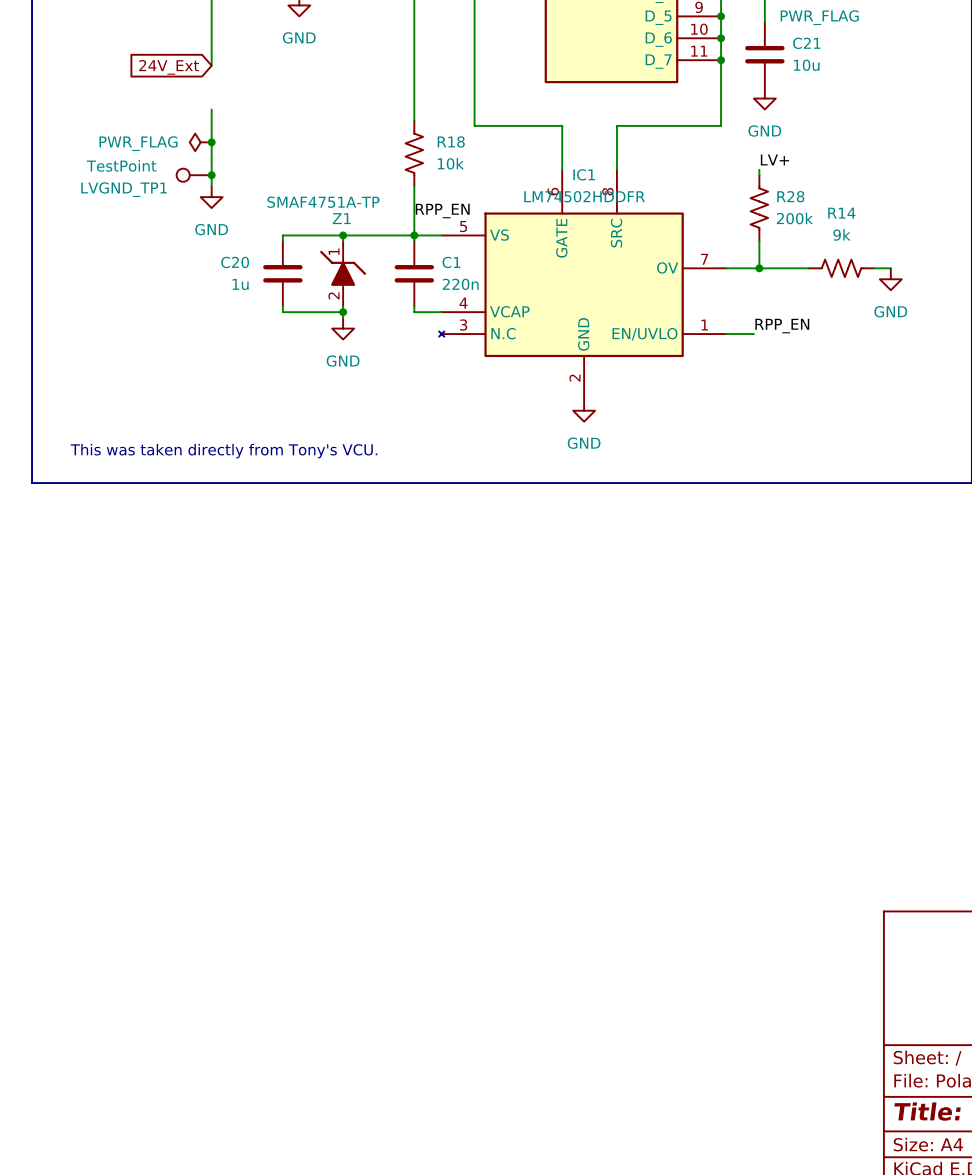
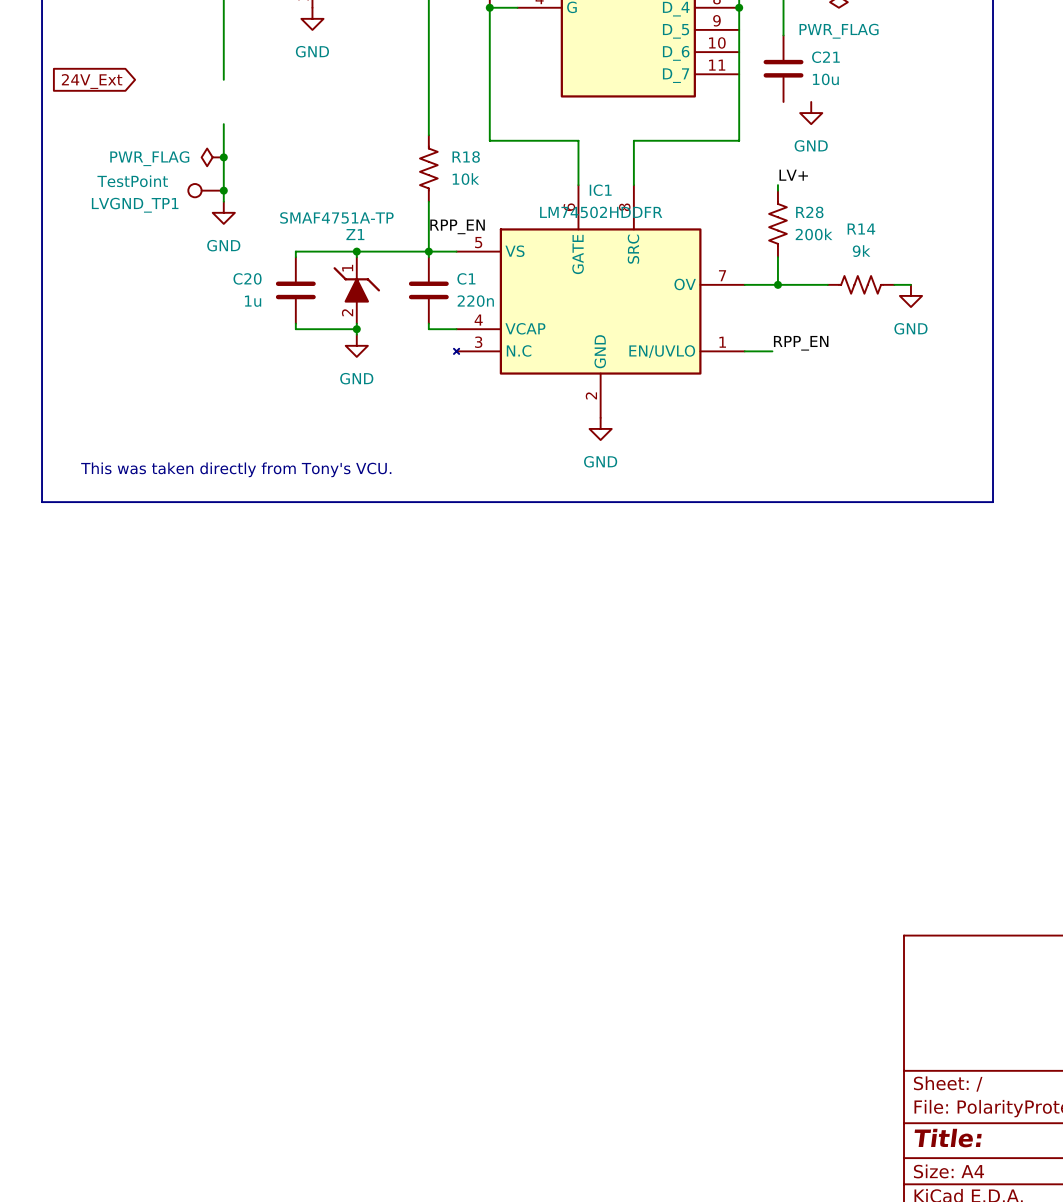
junction: (721, 16) -> none
junction: (721, 38) -> none
junction: (721, 60) -> none
global label position: 24V_Ext (169, 67) -> 24V_Ext (92, 81)
power symbol position: GND (764, 98) -> GND (811, 113)

